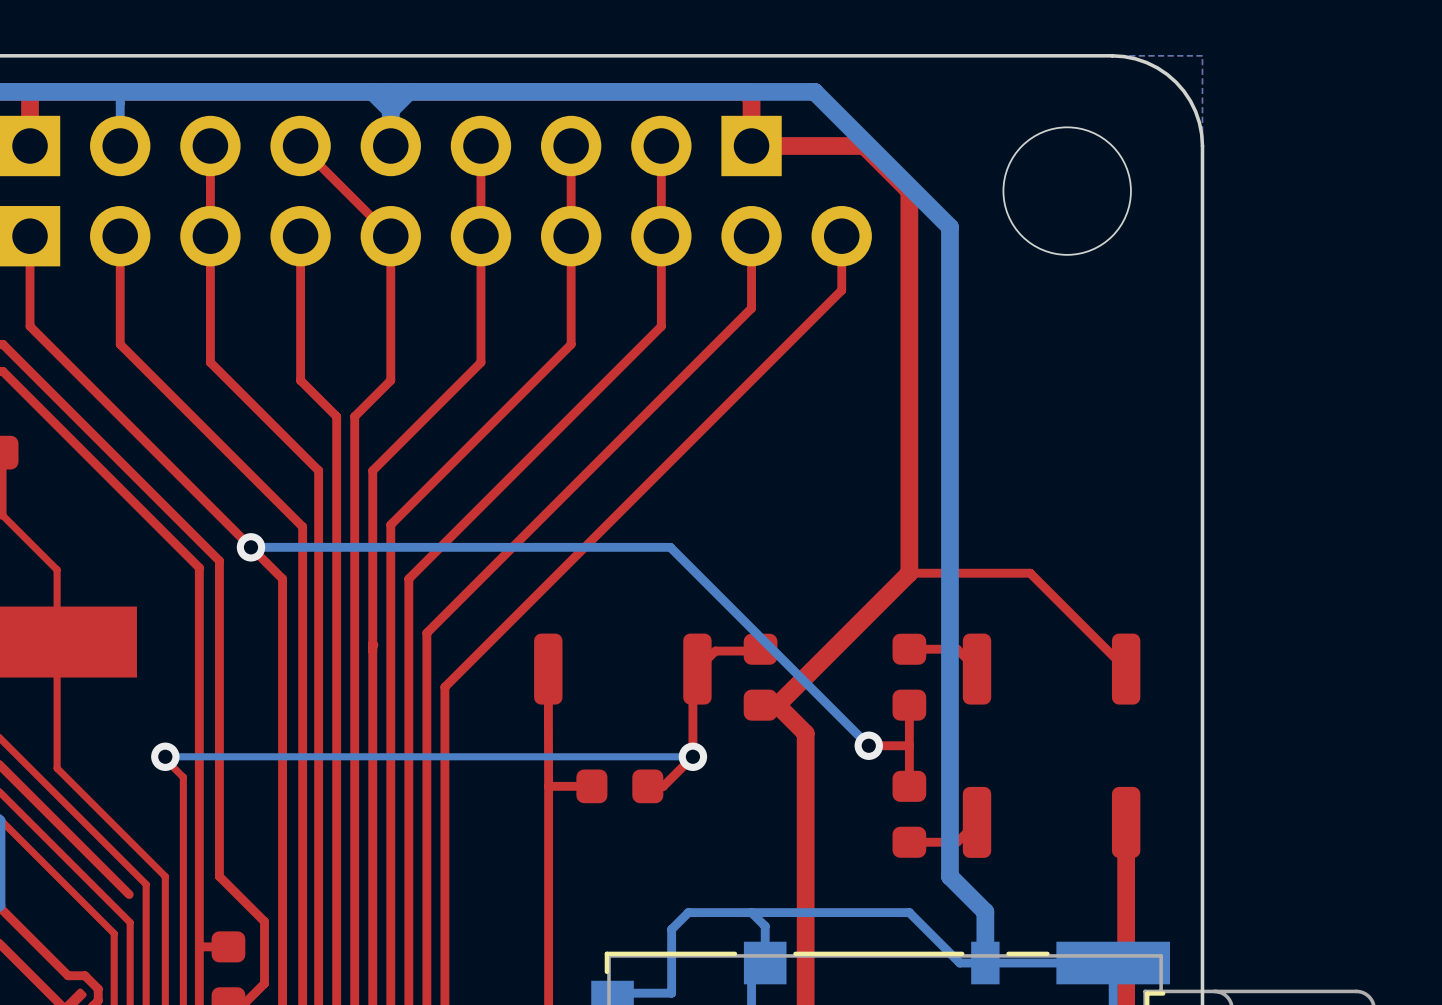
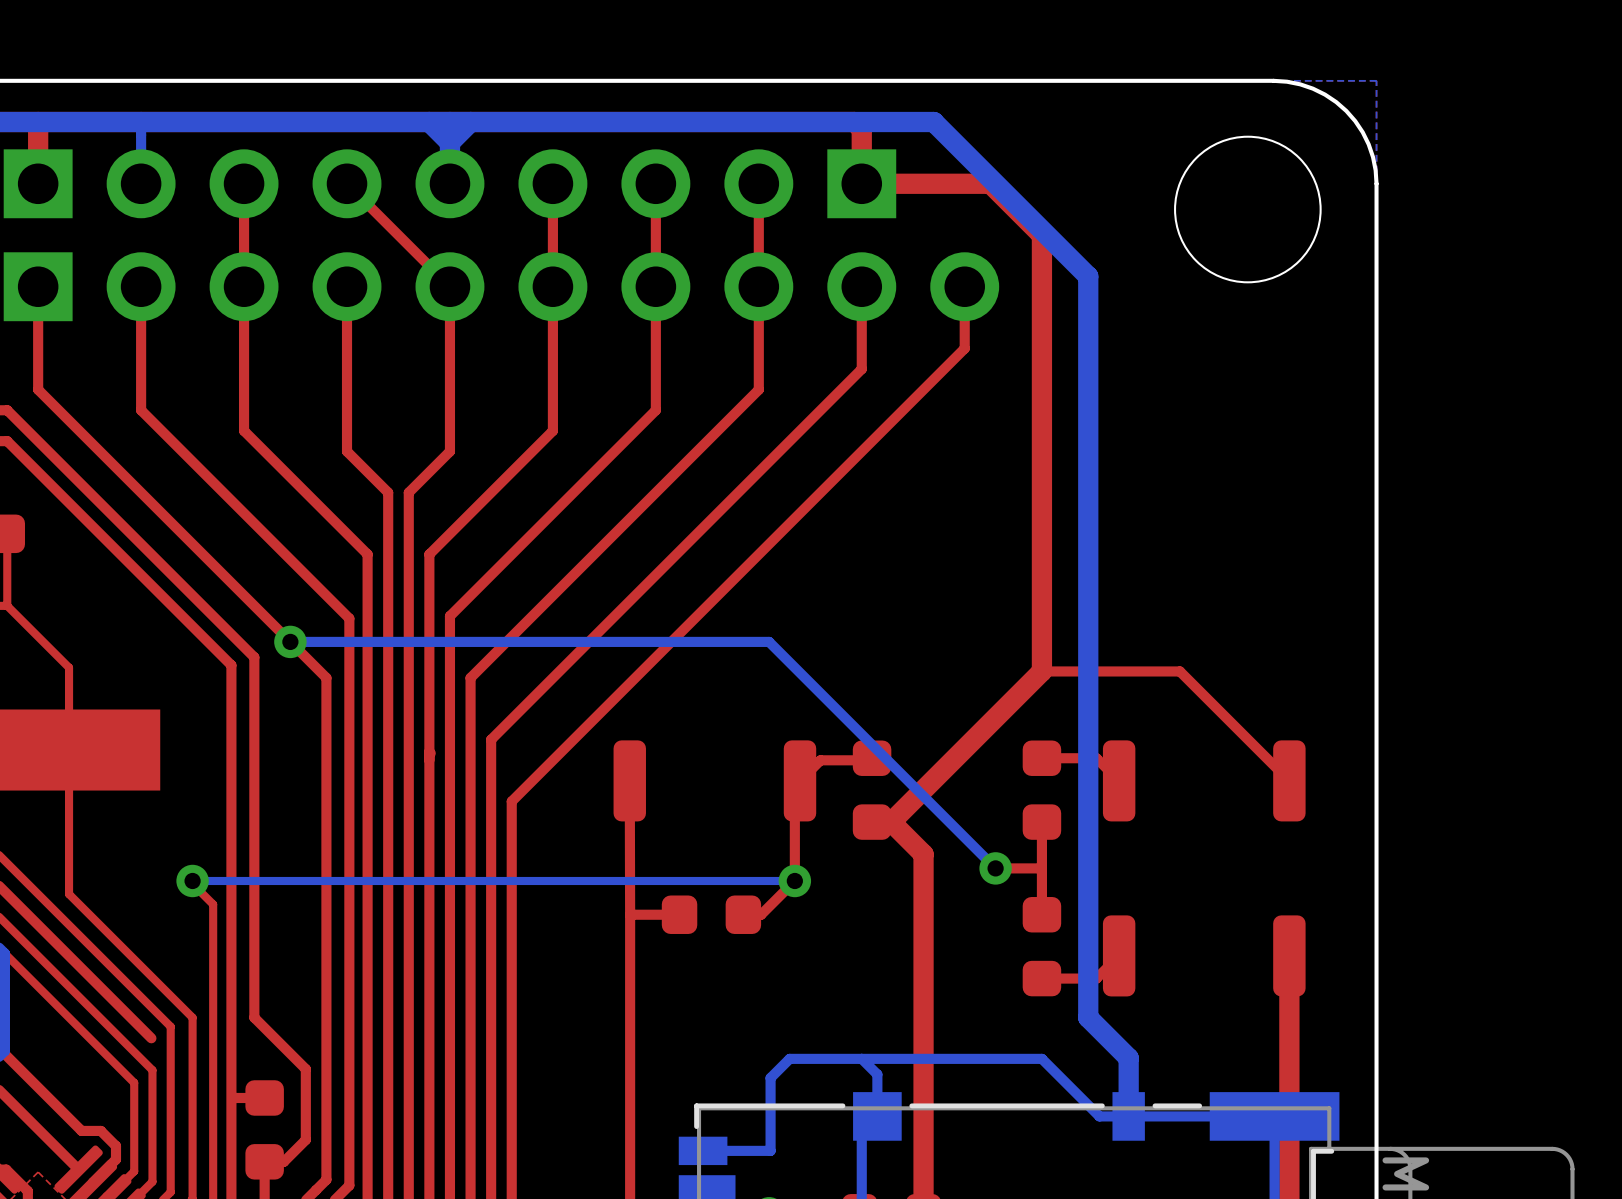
round board edge position: (1067, 191) -> (1247, 209)

